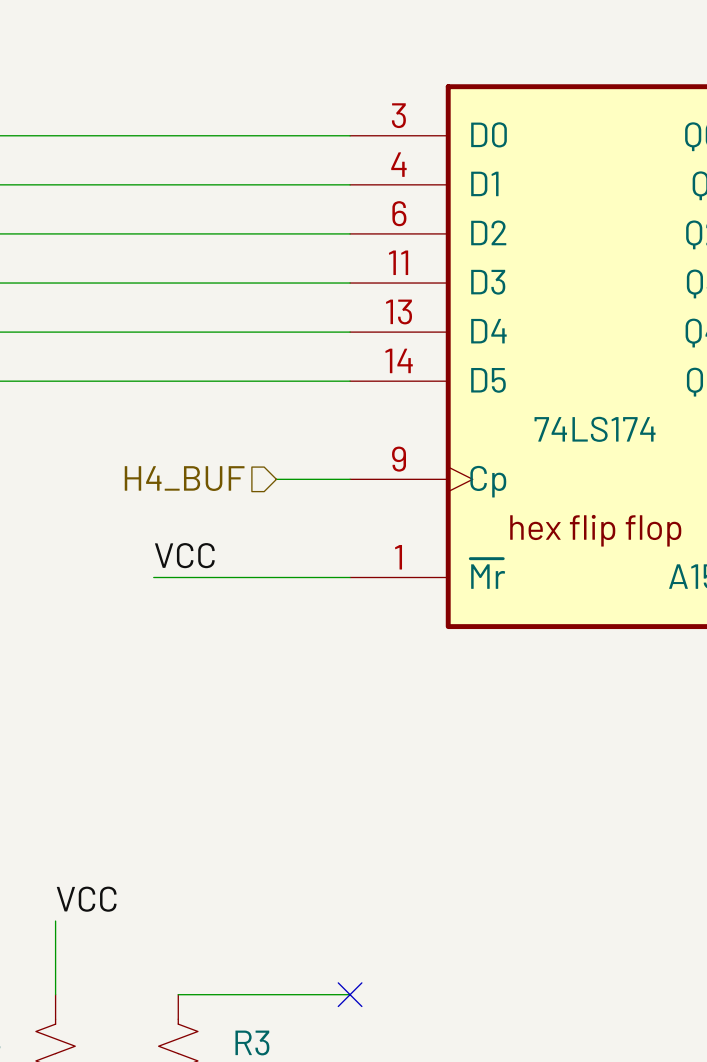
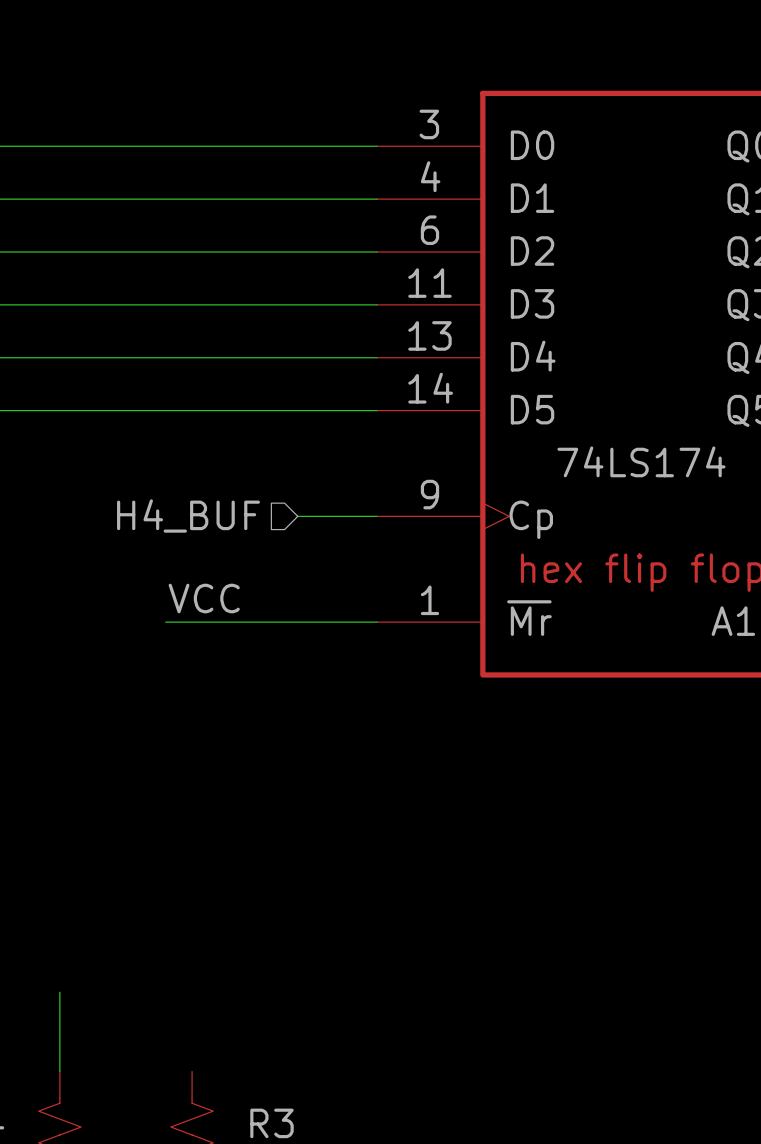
label: VCC (86, 899) -> none
wire: (178, 994) (350, 994) -> none
no-connect mark: (350, 994) -> none

